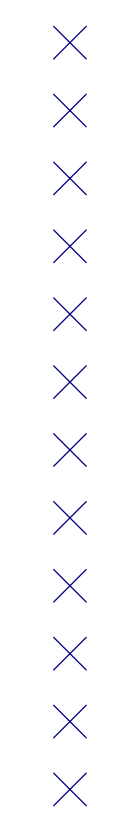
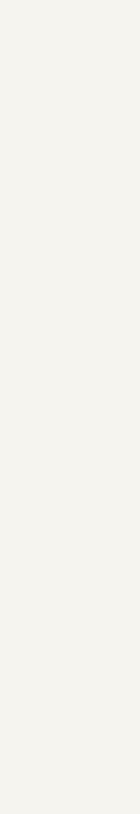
no-connect mark: (69, 42) -> none
no-connect mark: (69, 110) -> none
no-connect mark: (69, 178) -> none
no-connect mark: (69, 246) -> none
no-connect mark: (69, 314) -> none
no-connect mark: (69, 382) -> none
no-connect mark: (69, 449) -> none
no-connect mark: (69, 517) -> none
no-connect mark: (69, 585) -> none
no-connect mark: (69, 653) -> none
no-connect mark: (69, 721) -> none
no-connect mark: (69, 789) -> none

